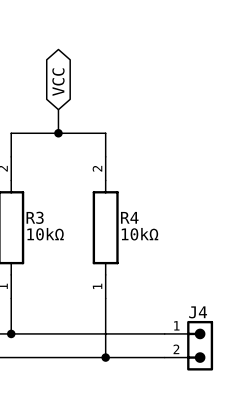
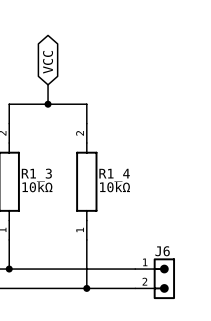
R3 name: R3 (35, 217) -> R1_3 (36, 175)
R4 name: R4 (129, 217) -> R1_4 (114, 175)
J4 name: J4 (198, 312) -> J6 (162, 251)

